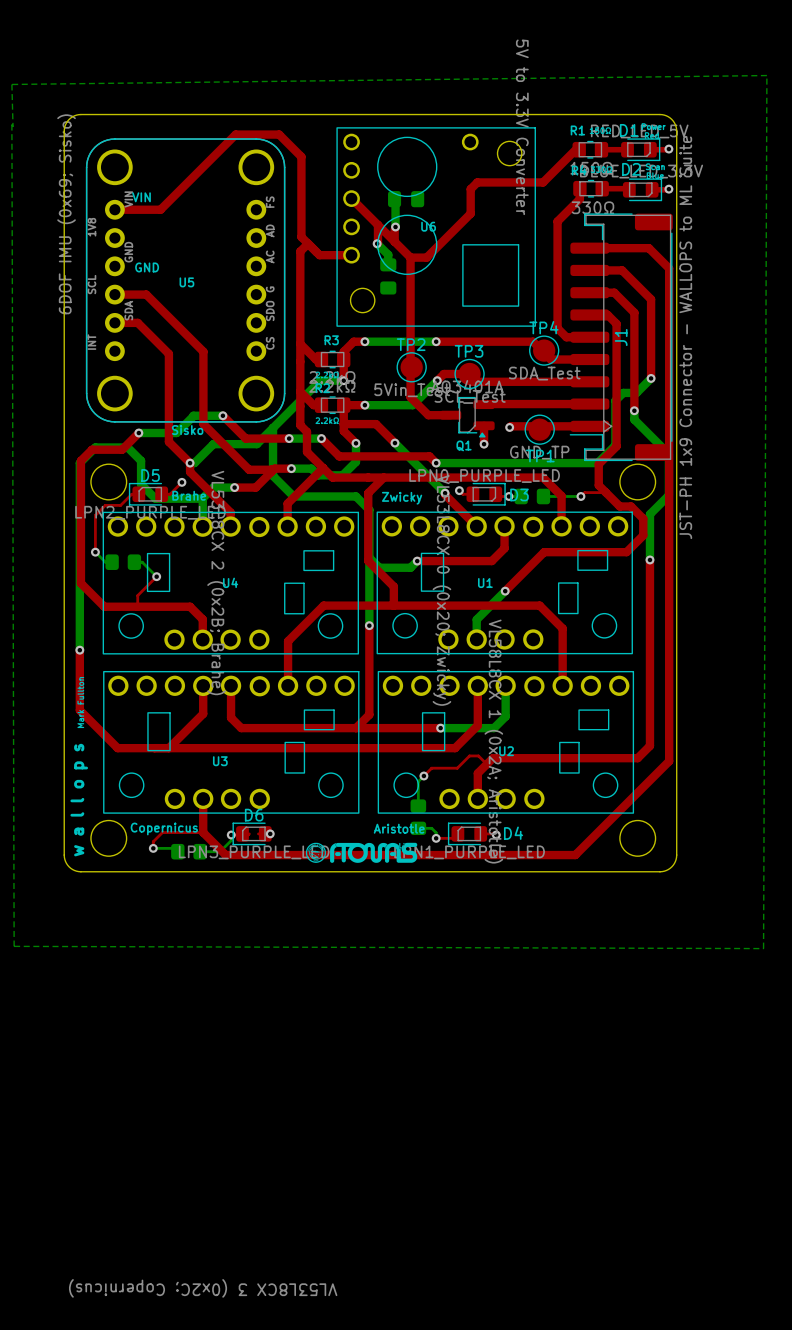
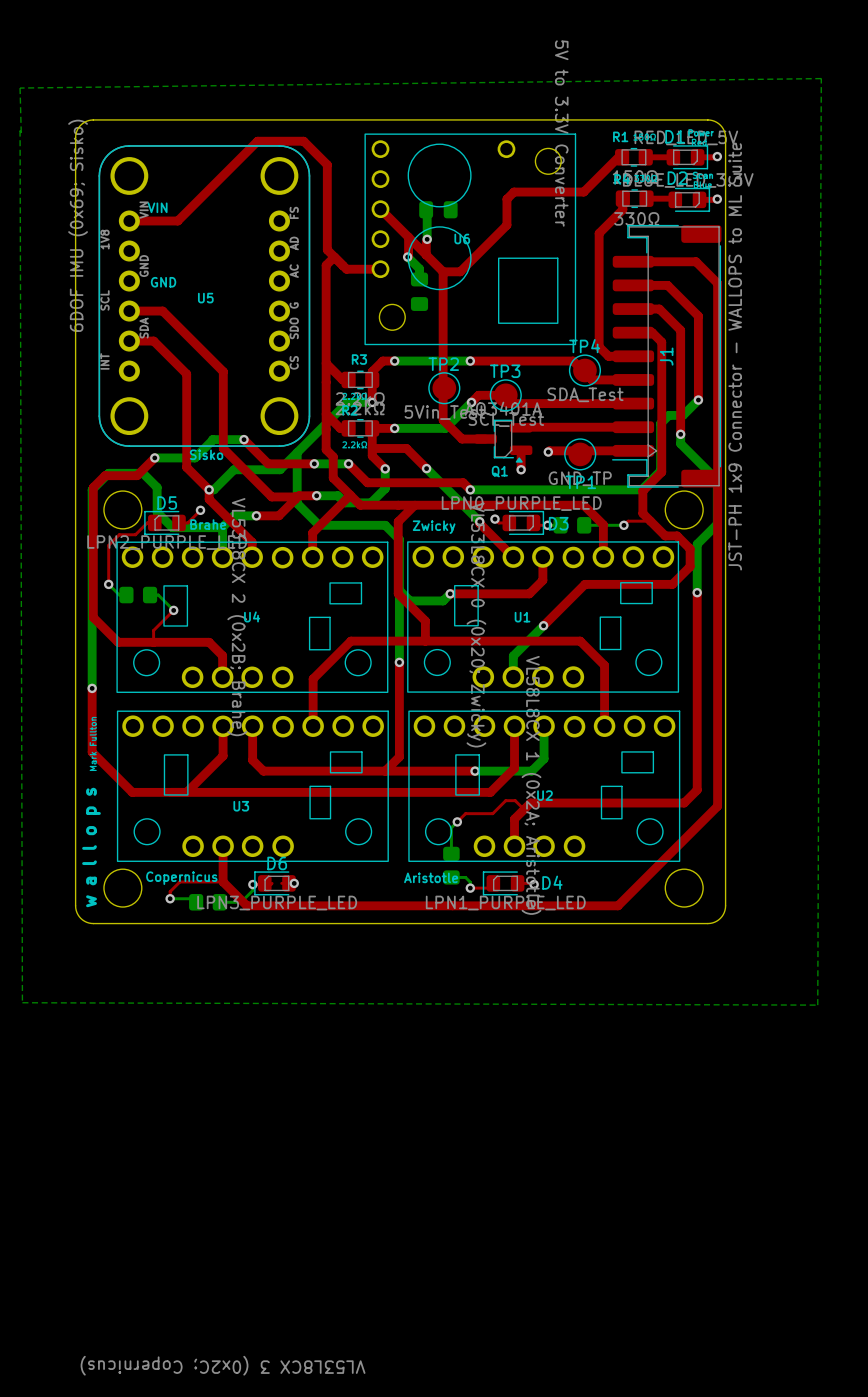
drawing: [305, 842, 418, 863] -> none

